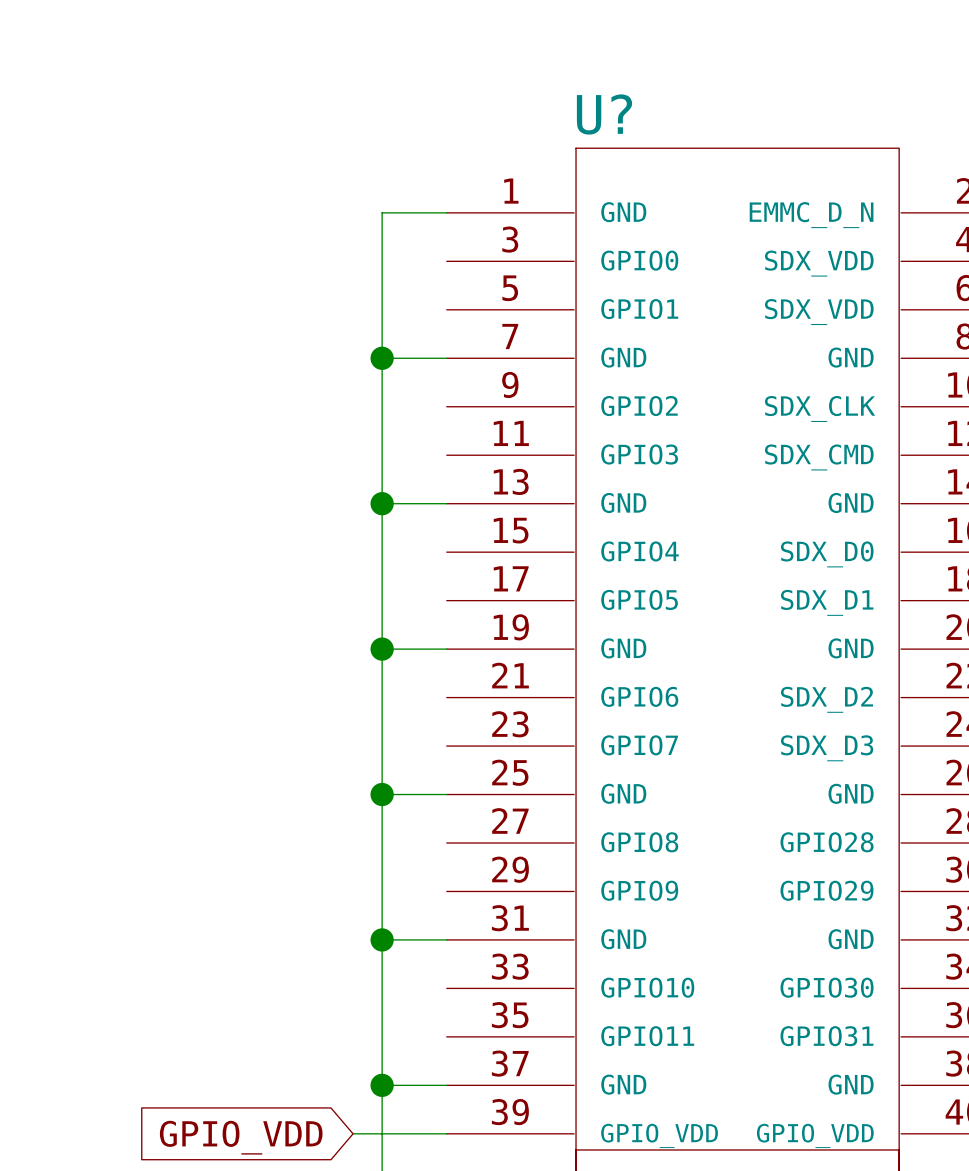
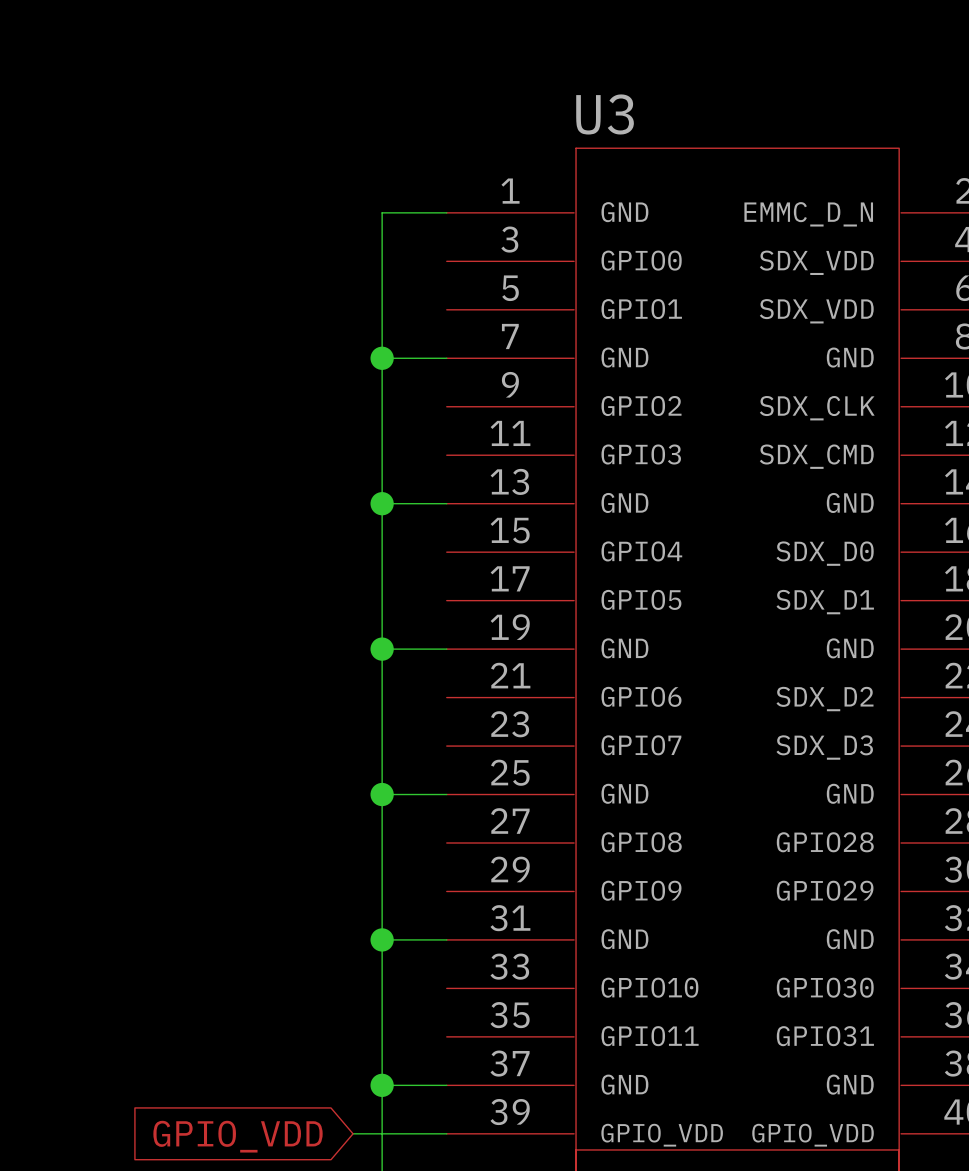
U? name: U? (604, 114) -> U3 (605, 114)

